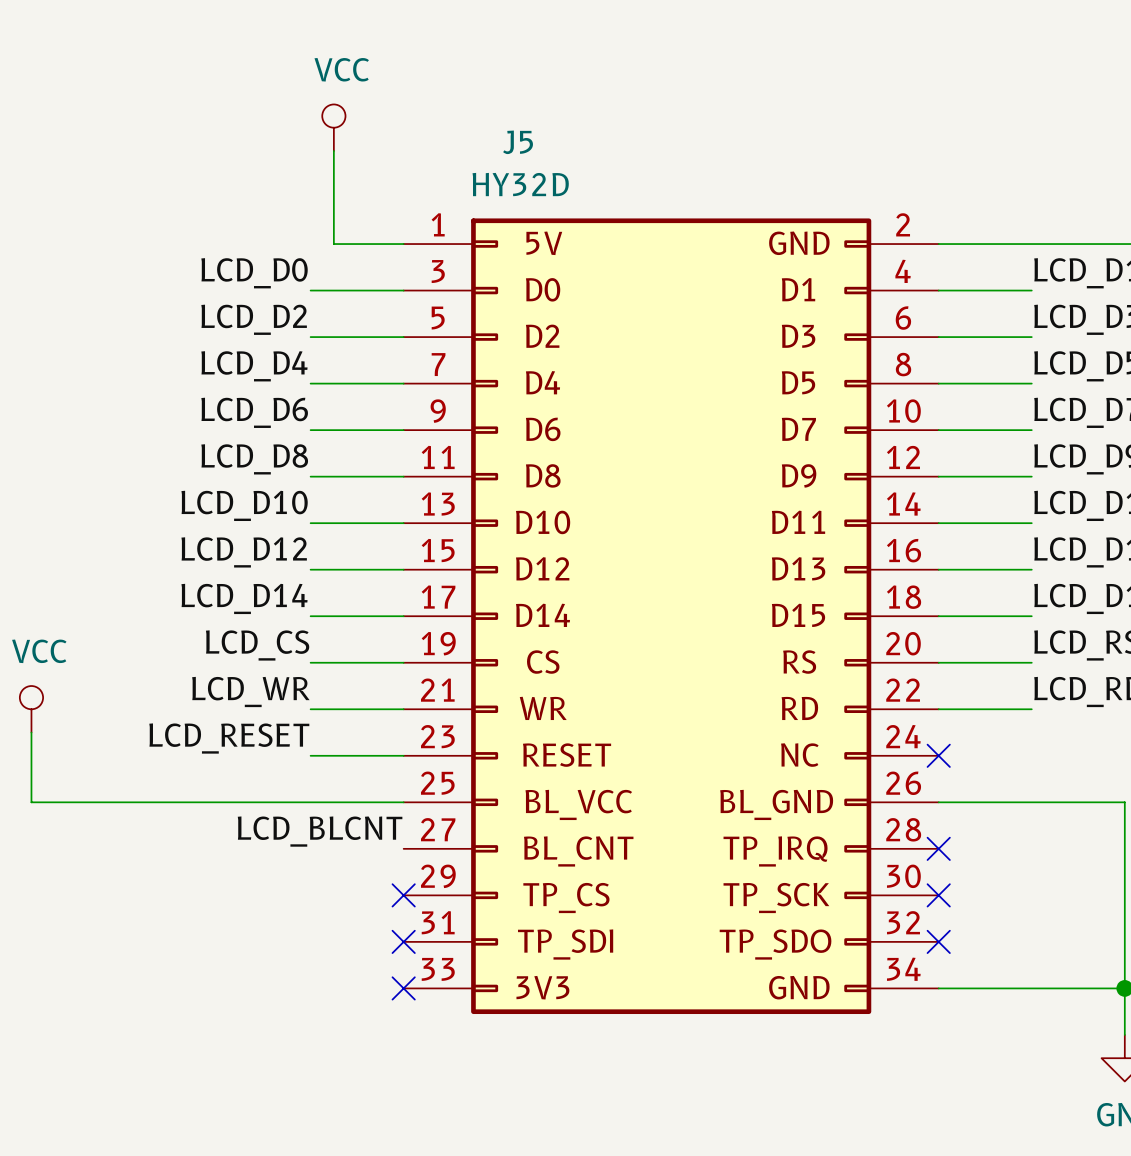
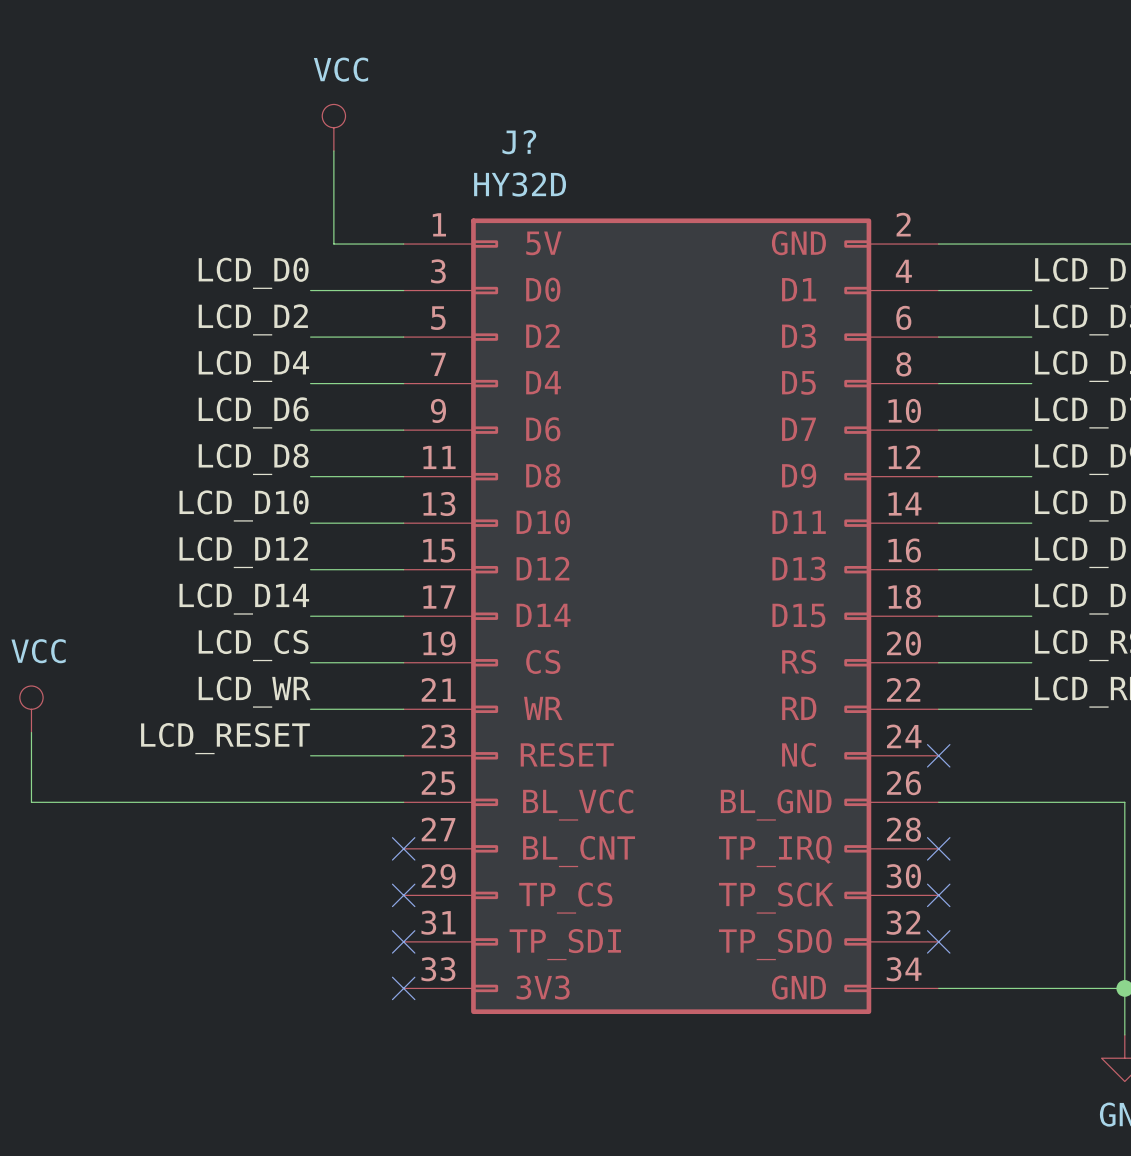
J5 name: J5 (518, 142) -> J? (519, 142)
label: LCD_BLCNT (320, 831) -> none
no-connect mark: none -> (403, 848)

